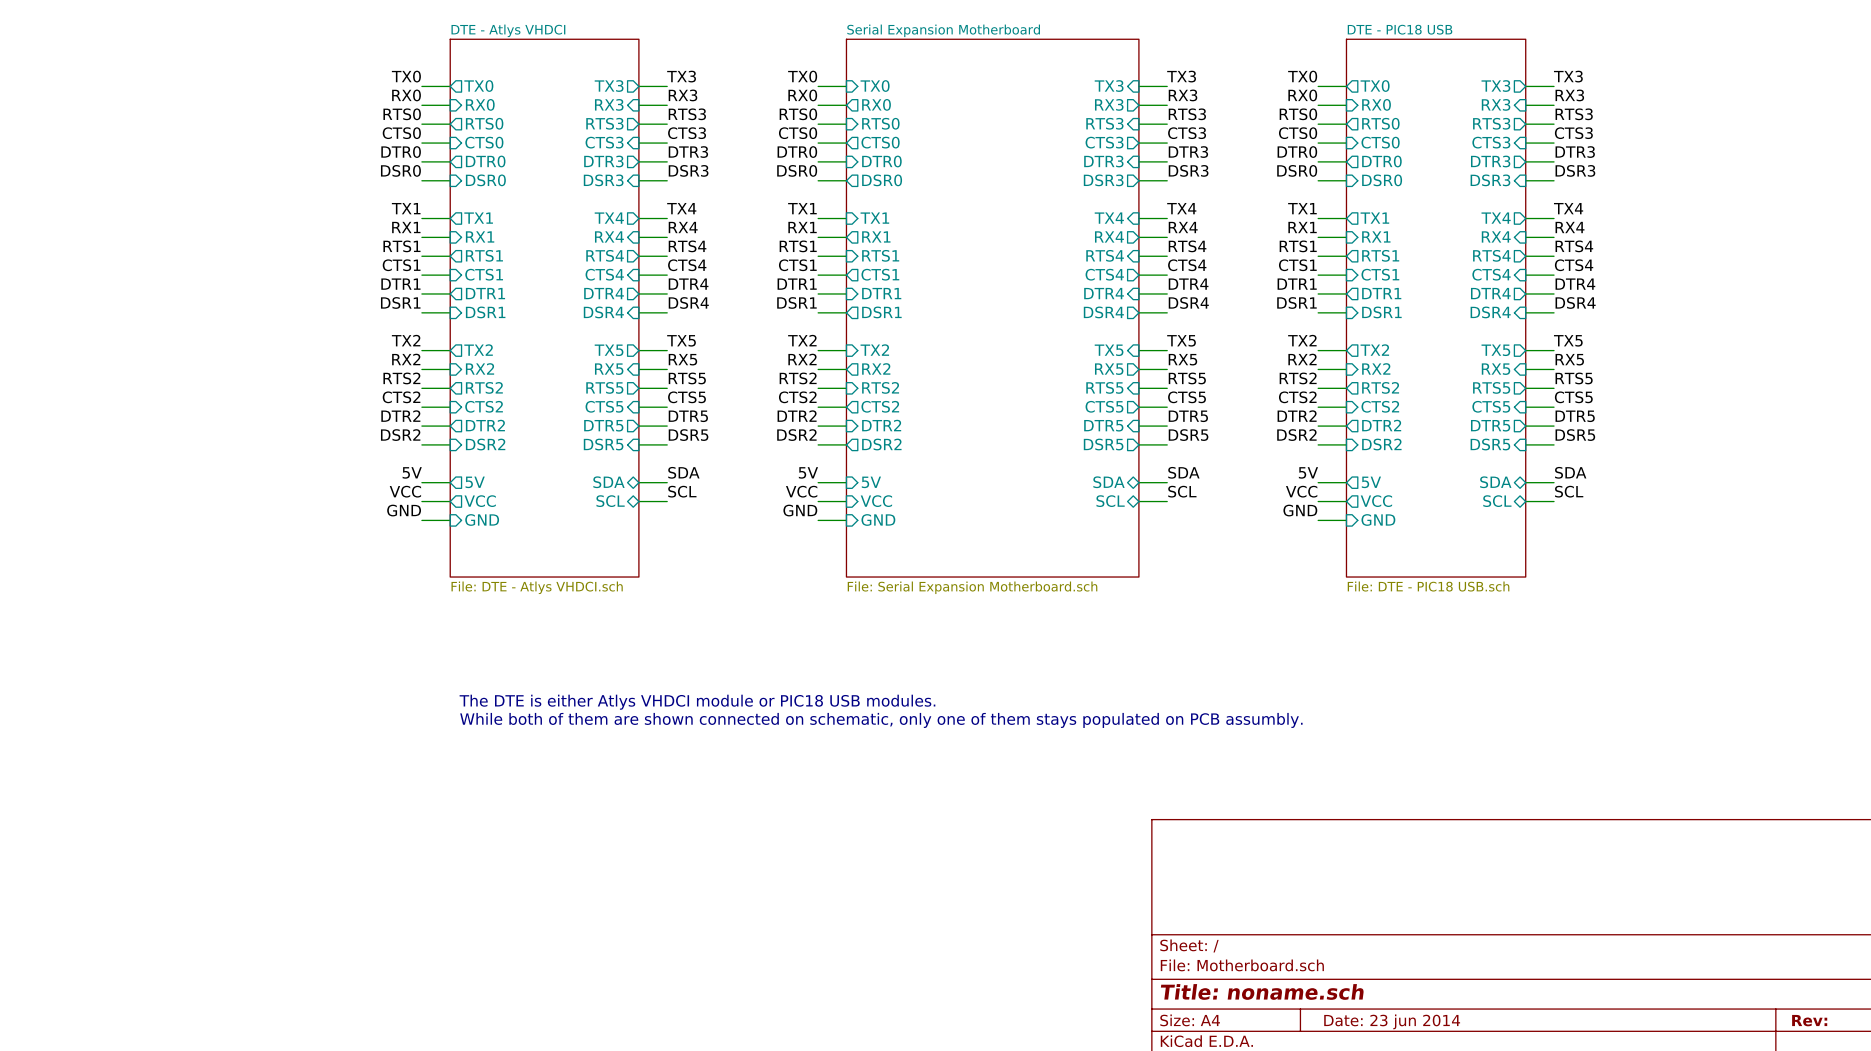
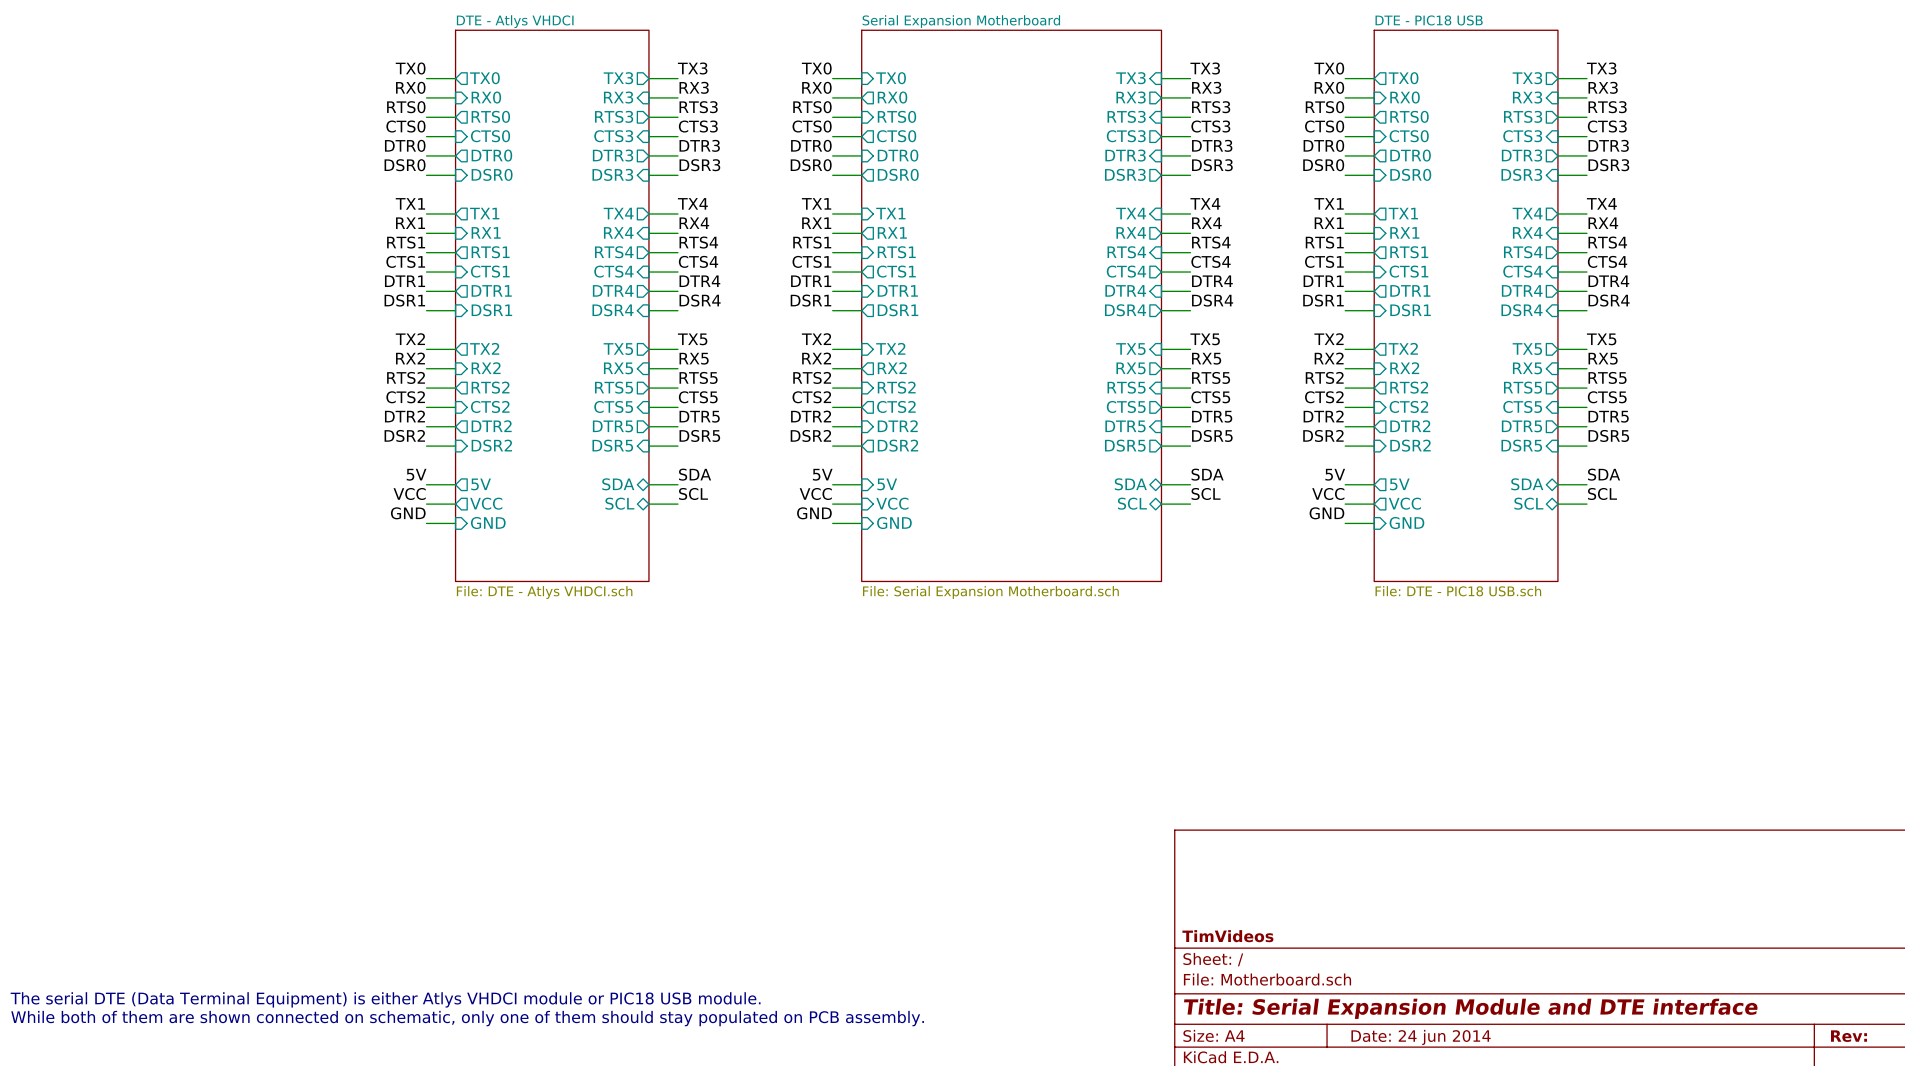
text: The DTE is either Atlys VHDCI module or PIC18 USB modules. (697, 702) -> none
text: While both of them are shown connected on schematic, only one of them stays populated on PCB assumbly. (881, 720) -> none
title block: none -> TimVideos (1227, 936)
text: none -> The serial DTE (Data Terminal Equipment) is either Atlys VHDCI module or PIC18 USB module. (385, 999)
title block: Title: noname.sch (1262, 991) -> Title: Serial Expansion Module and DTE interface (1470, 1008)
text: none -> While both of them are shown connected on schematic, only one of them should stay populated on PCB assembly. (467, 1018)
title block: Date: 23 jun 2014 (1392, 1021) -> Date: 24 jun 2014 (1421, 1037)

